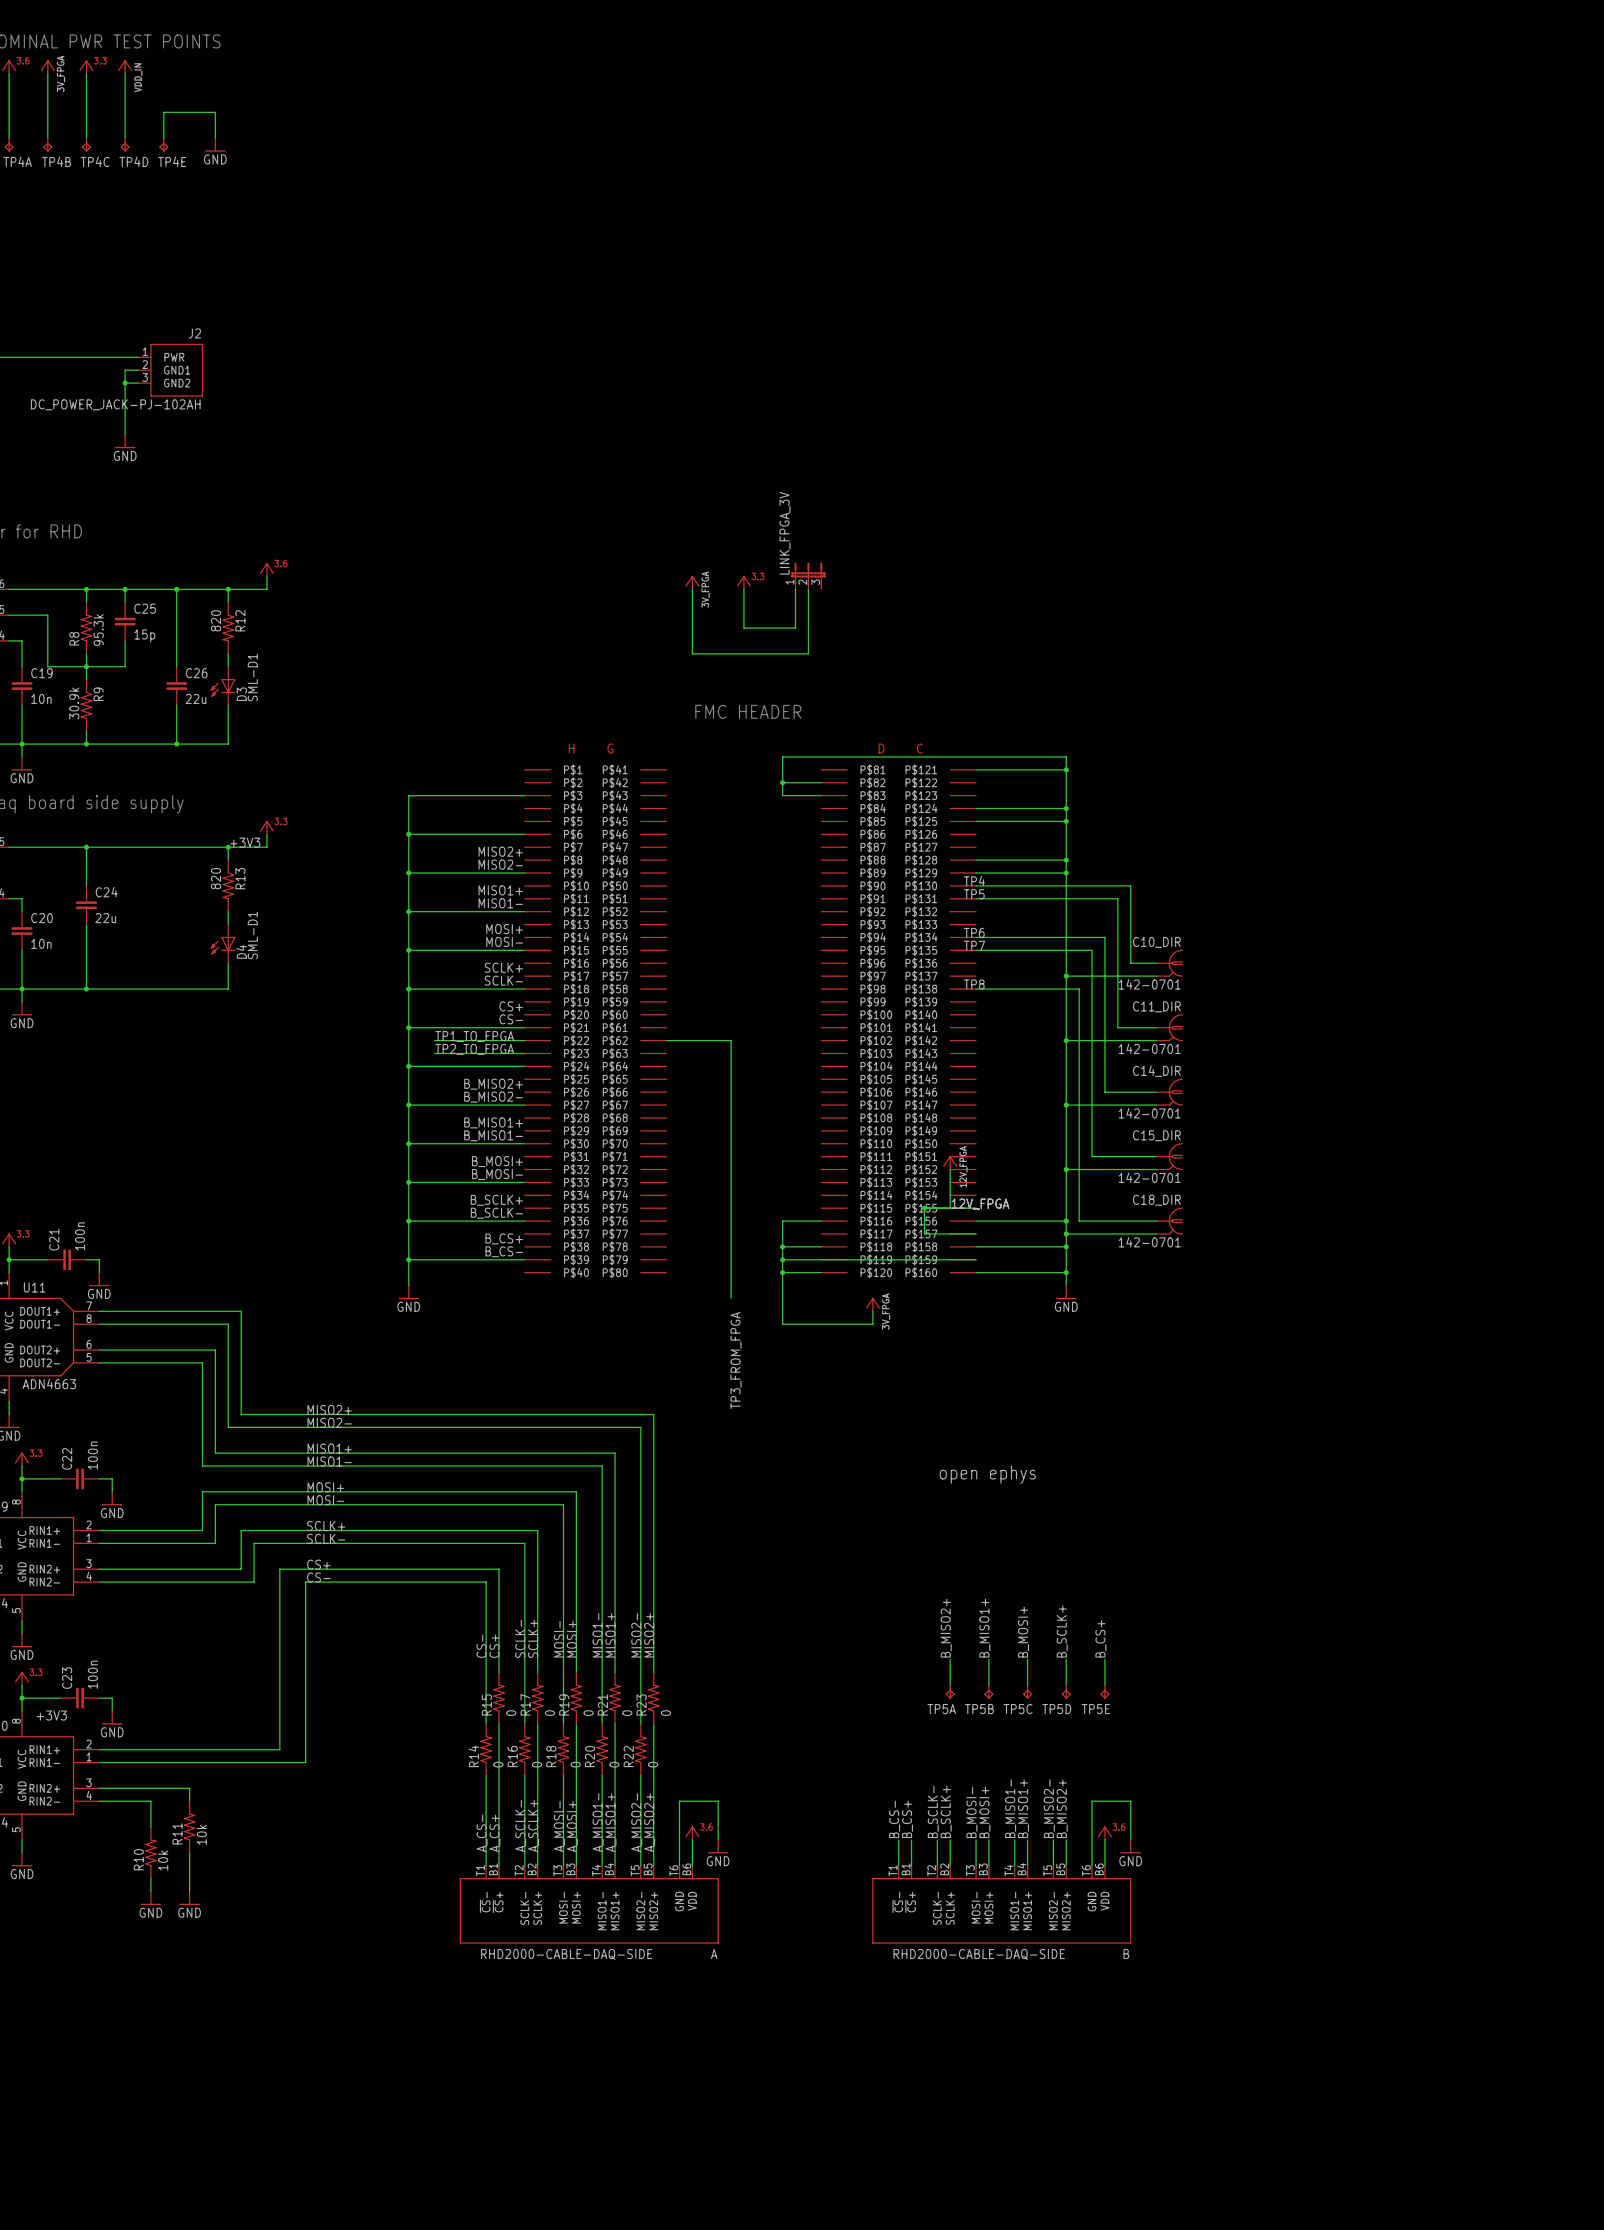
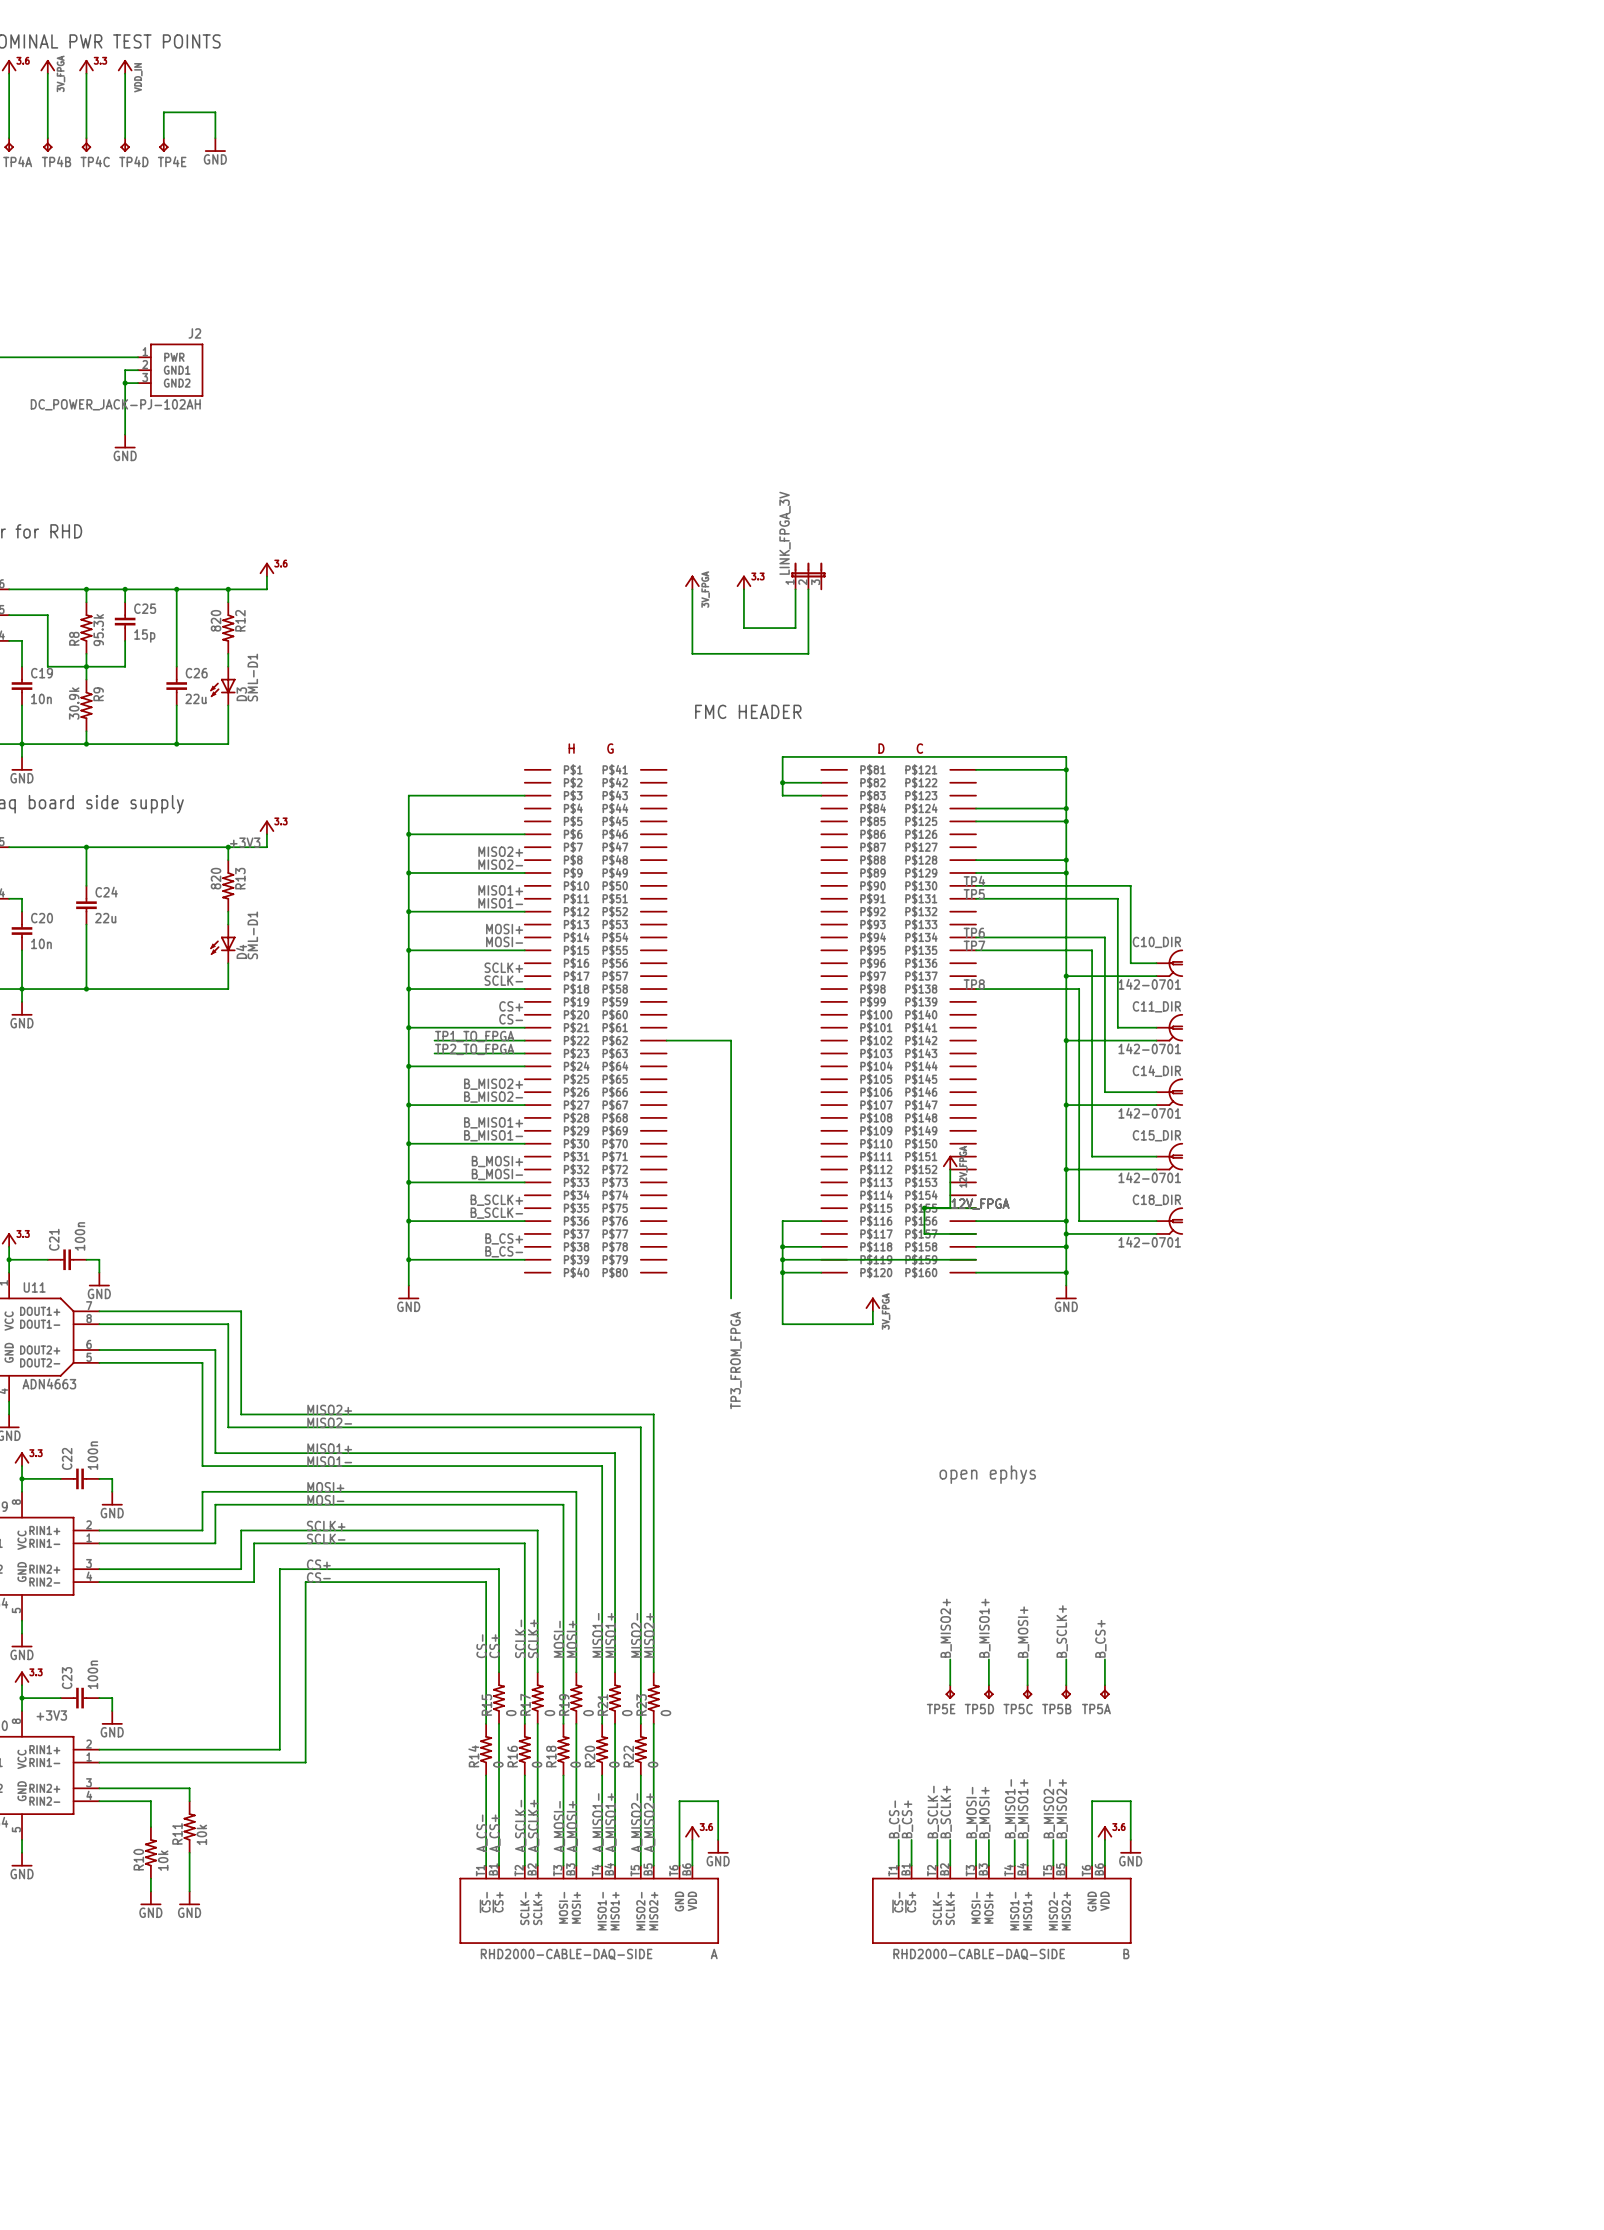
TP5A name: TP5A (941, 1709) -> TP5E (941, 1709)
TP5B name: TP5B (979, 1709) -> TP5D (979, 1709)
TP5D name: TP5D (1056, 1709) -> TP5B (1056, 1709)
TP5E name: TP5E (1095, 1709) -> TP5A (1096, 1709)

